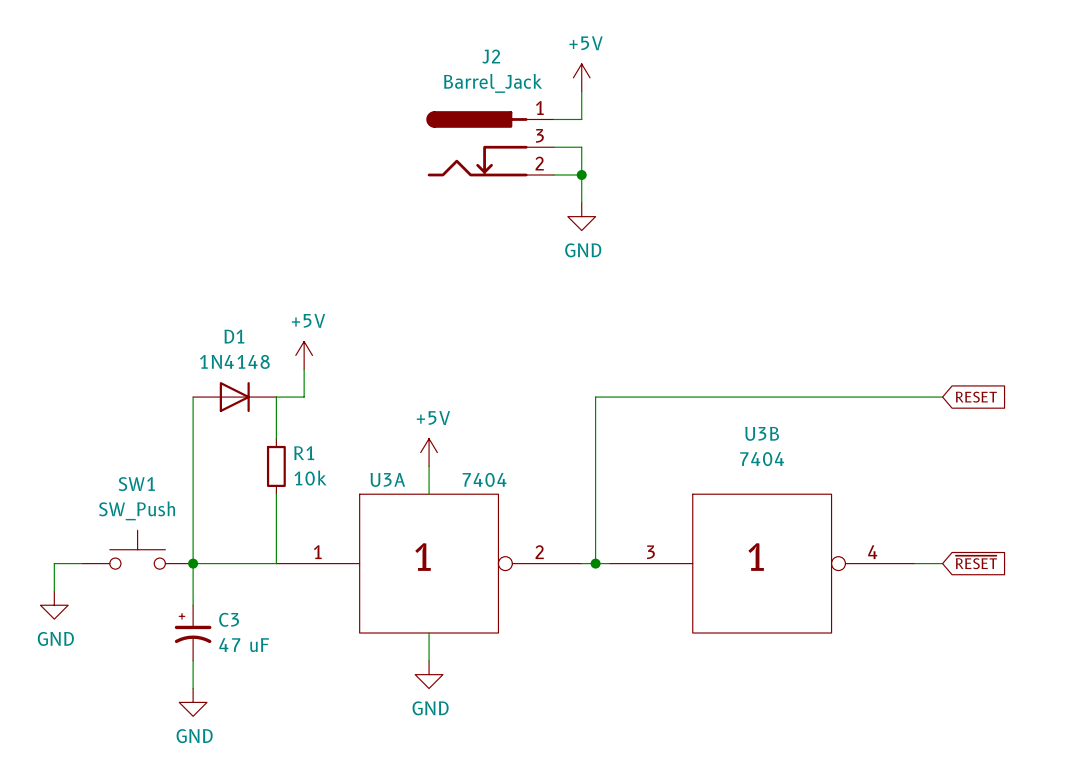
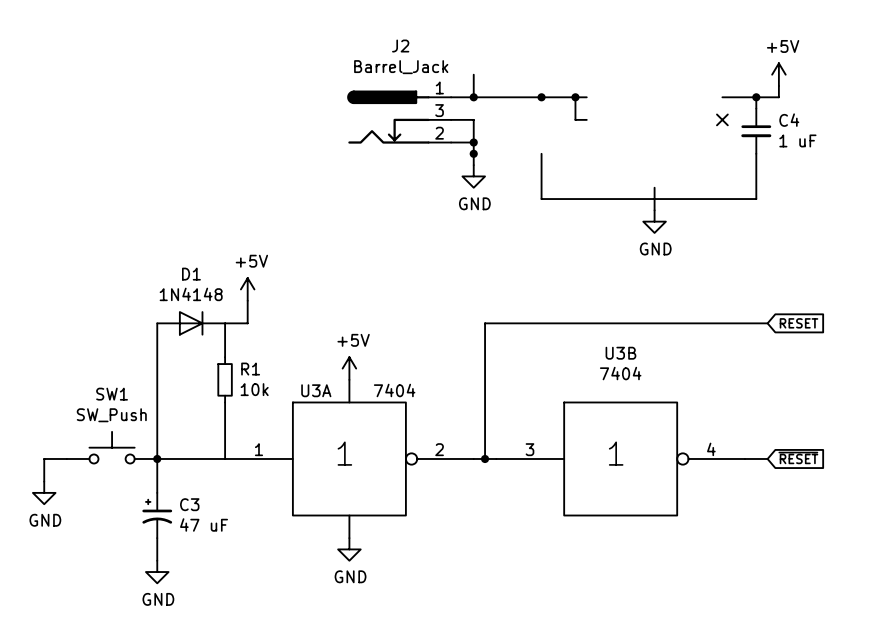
power symbol: +5V (581, 77) -> none
power symbol: none -> +5V (778, 74)
wire: none -> (778, 86) (778, 97) (722, 97)
wire: none -> (473, 97) (586, 97)
junction: none -> (473, 97)
junction: none -> (541, 97)
wire: none -> (575, 97) (575, 119) (586, 119)
junction: none -> (575, 97)
wire: none -> (756, 97) (756, 108)
junction: none -> (756, 97)
no-connect mark: none -> (722, 119)
C4: none -> 1 uF (756, 131)
junction: none -> (473, 153)
wire: none -> (541, 153) (541, 199) (756, 199) (756, 153)
wire: none -> (654, 187) (654, 210)
power symbol: none -> GND (654, 221)

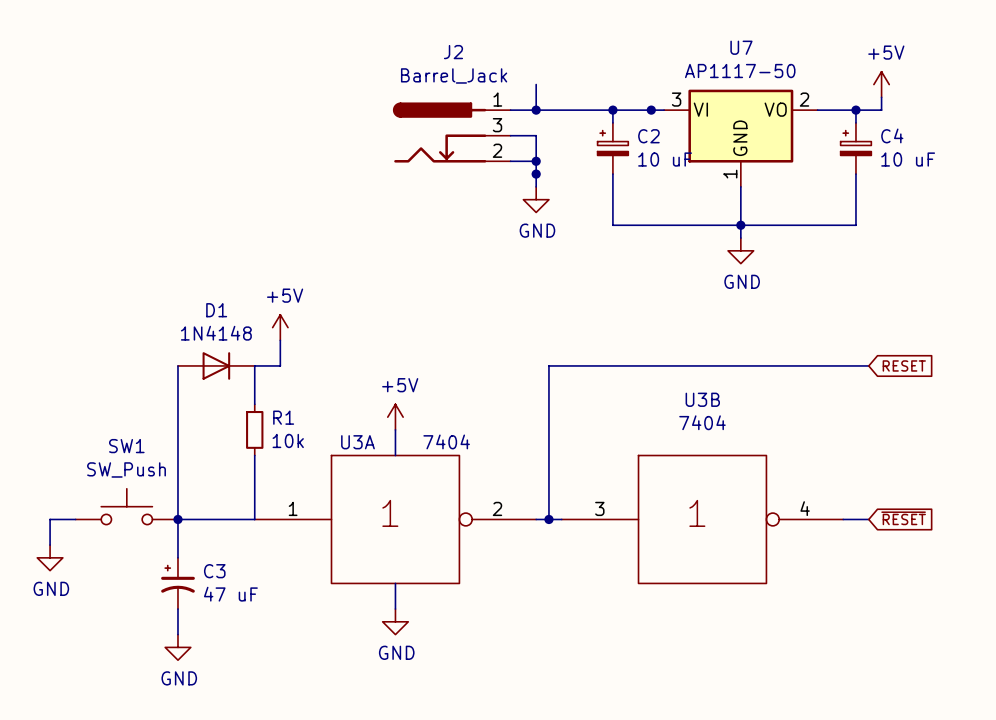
wire: none -> (612, 110) (612, 122)
wire: (575, 97) (575, 119) (586, 119) -> none
C4 symbol: [741, 108, 772, 154] -> [840, 122, 872, 175]
no-connect mark: (722, 119) -> none
U7: none -> AP1117-50 (740, 138)
C2: none -> 10 uF (612, 148)
C4 value: 1 uF (797, 140) -> 10 uF (908, 159)
wire: none -> (740, 186) (740, 212)
junction: none -> (740, 225)

